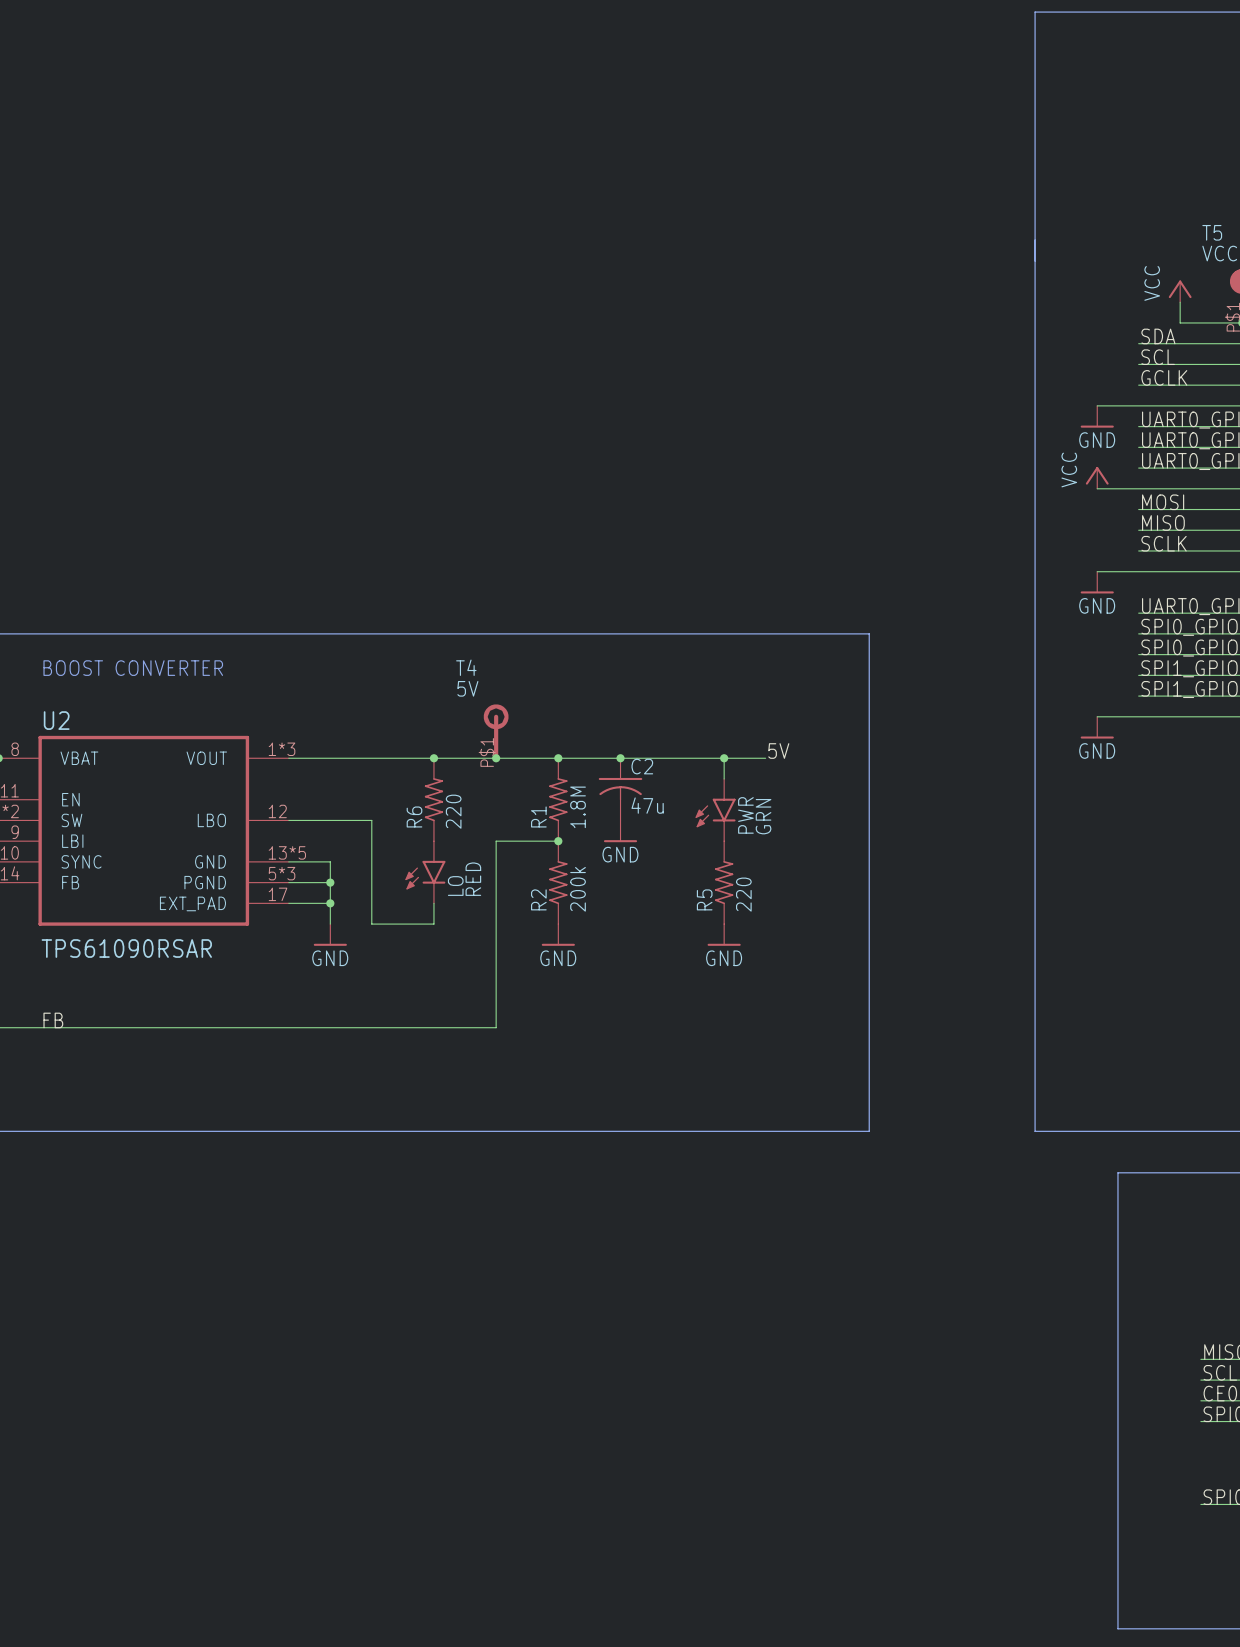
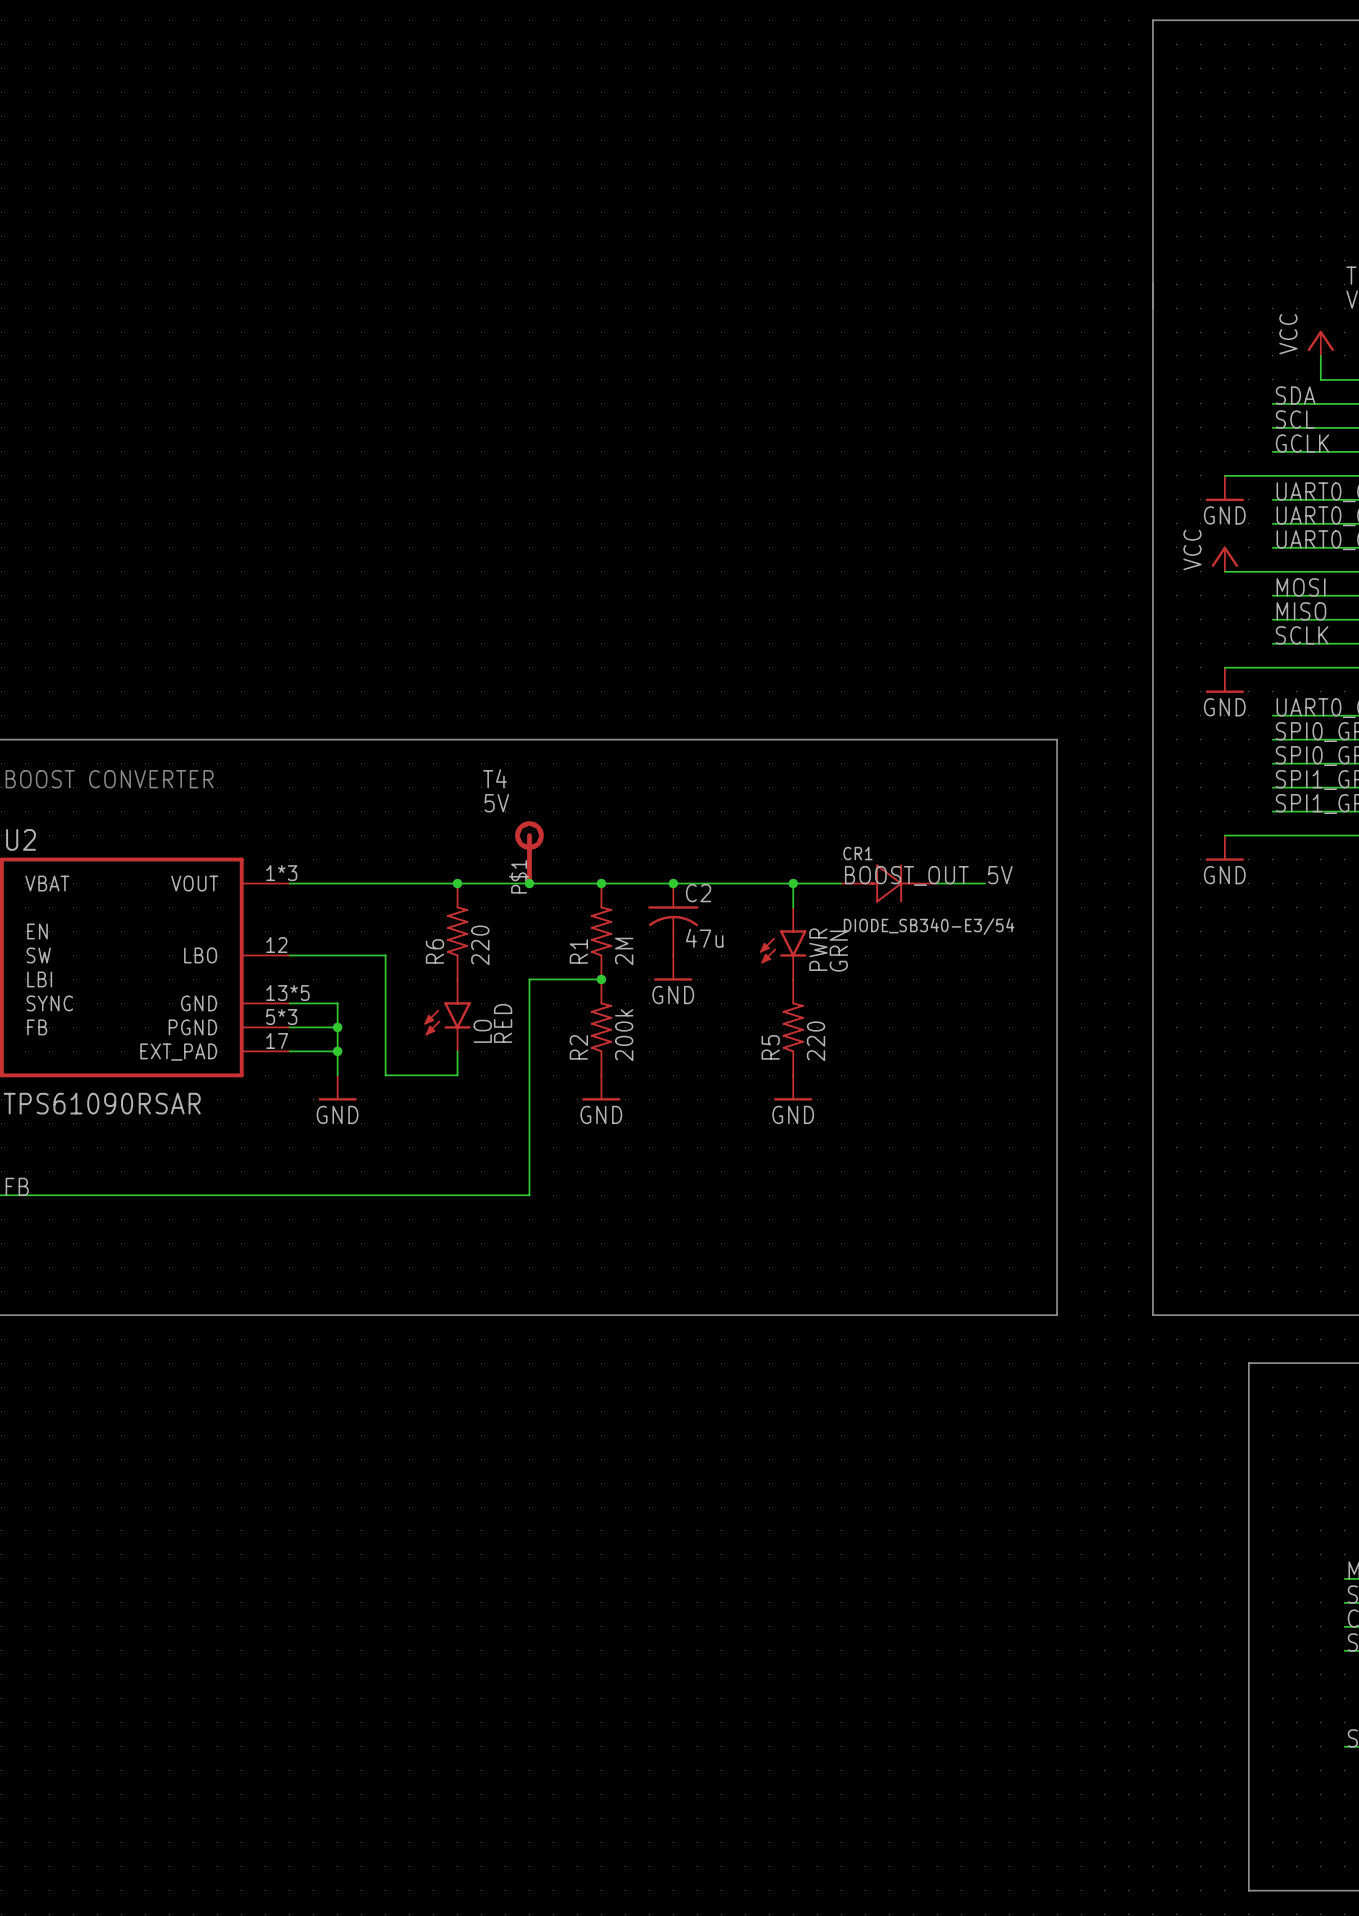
line: (869, 633) (869, 1131) -> (961, 739) (1057, 739) (1057, 1315) (961, 1315)
label: 5V (778, 751) -> BOOST_OUT (906, 875)
label: none -> 5V (1000, 875)
CR1: none -> DIODE_SB340-E3/54 (889, 883)
wire: none -> (937, 883) (985, 883)
R1 value: 1.8M (578, 807) -> 2M (624, 951)

